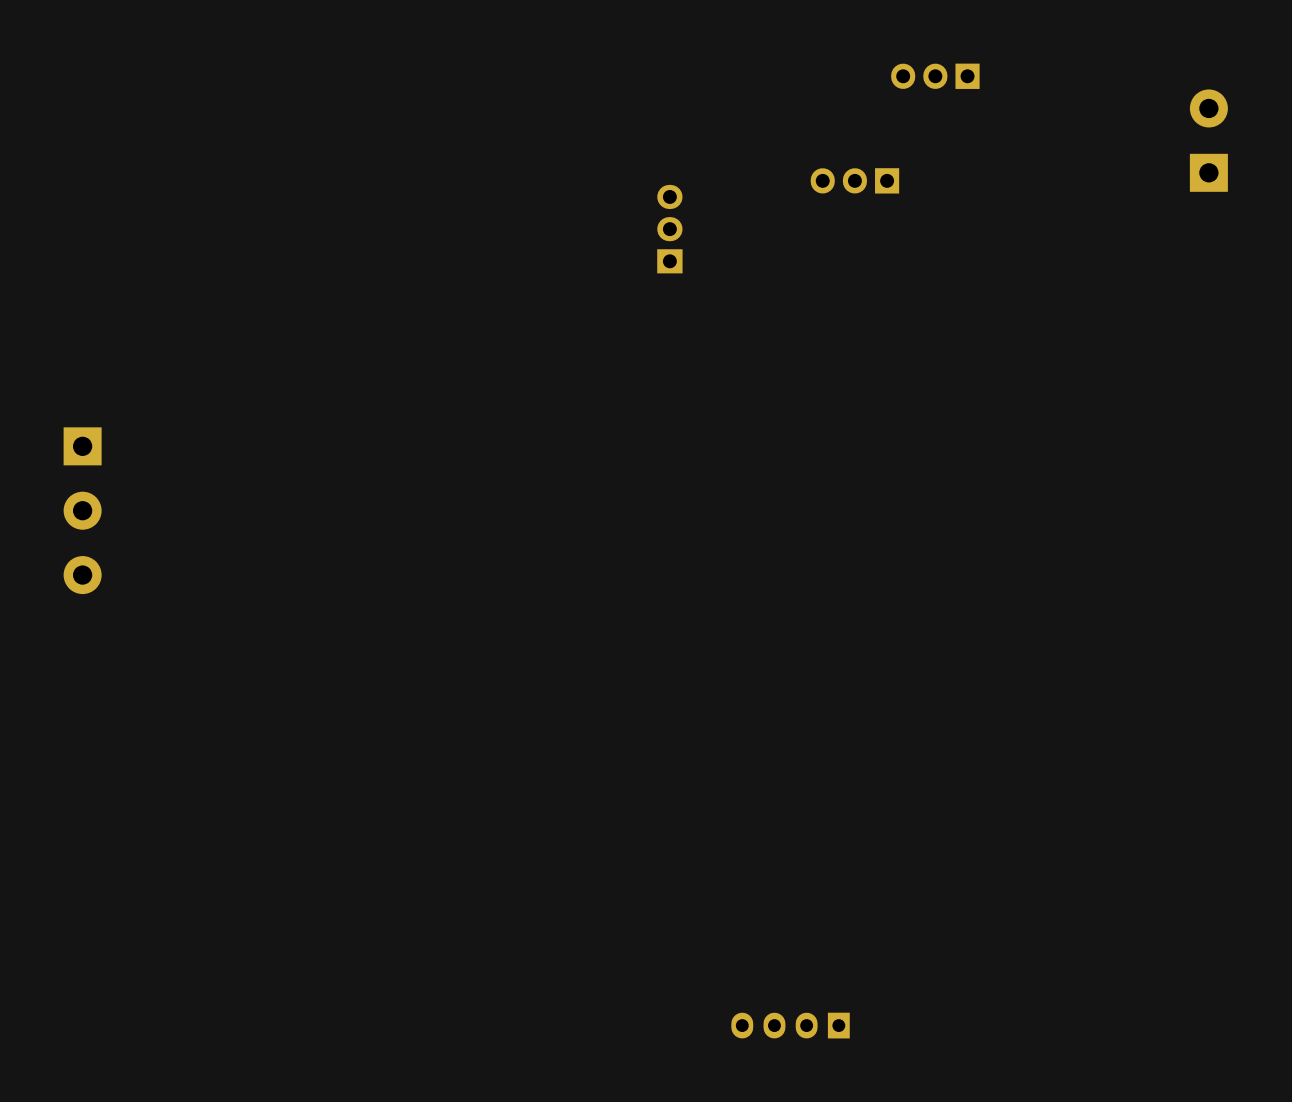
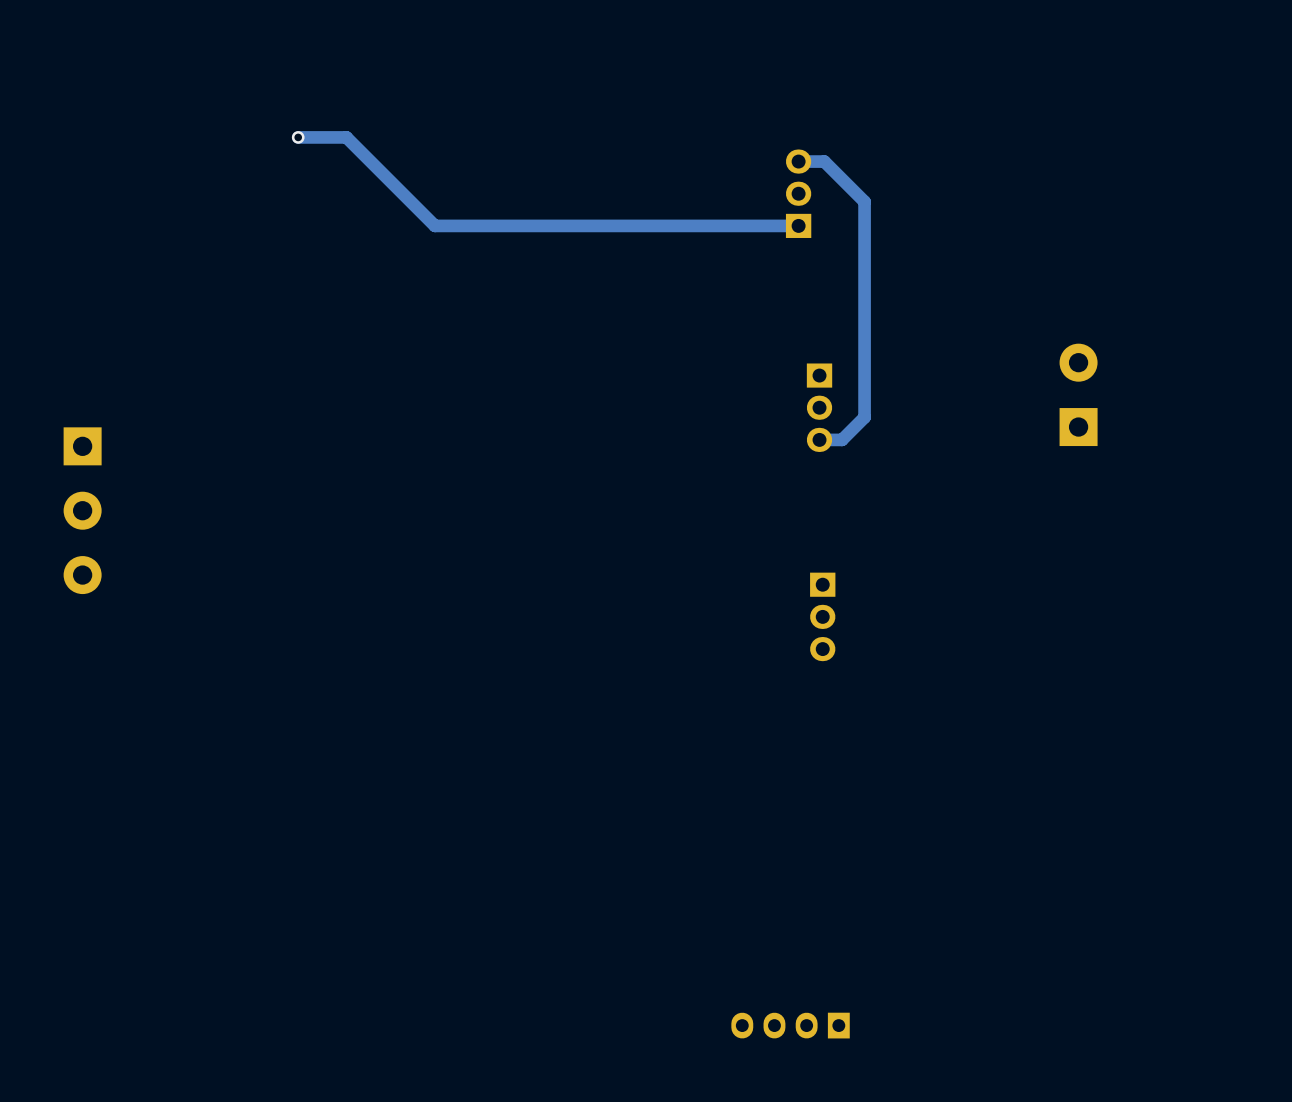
part: (935, 76) -> none
track: none -> (298, 137) (346, 137) (434, 225) (798, 225)
via: none -> (298, 137)
part position: (1208, 140) -> (1078, 394)
track: none -> (798, 161) (824, 161) (864, 201) (864, 417) (842, 439) (819, 439)
part rotation: 0° (854, 180) -> 90° clockwise (798, 193)
part position: (854, 180) -> (798, 193)
part: (669, 229) -> none
part: none -> (819, 407)
part: none -> (822, 616)

